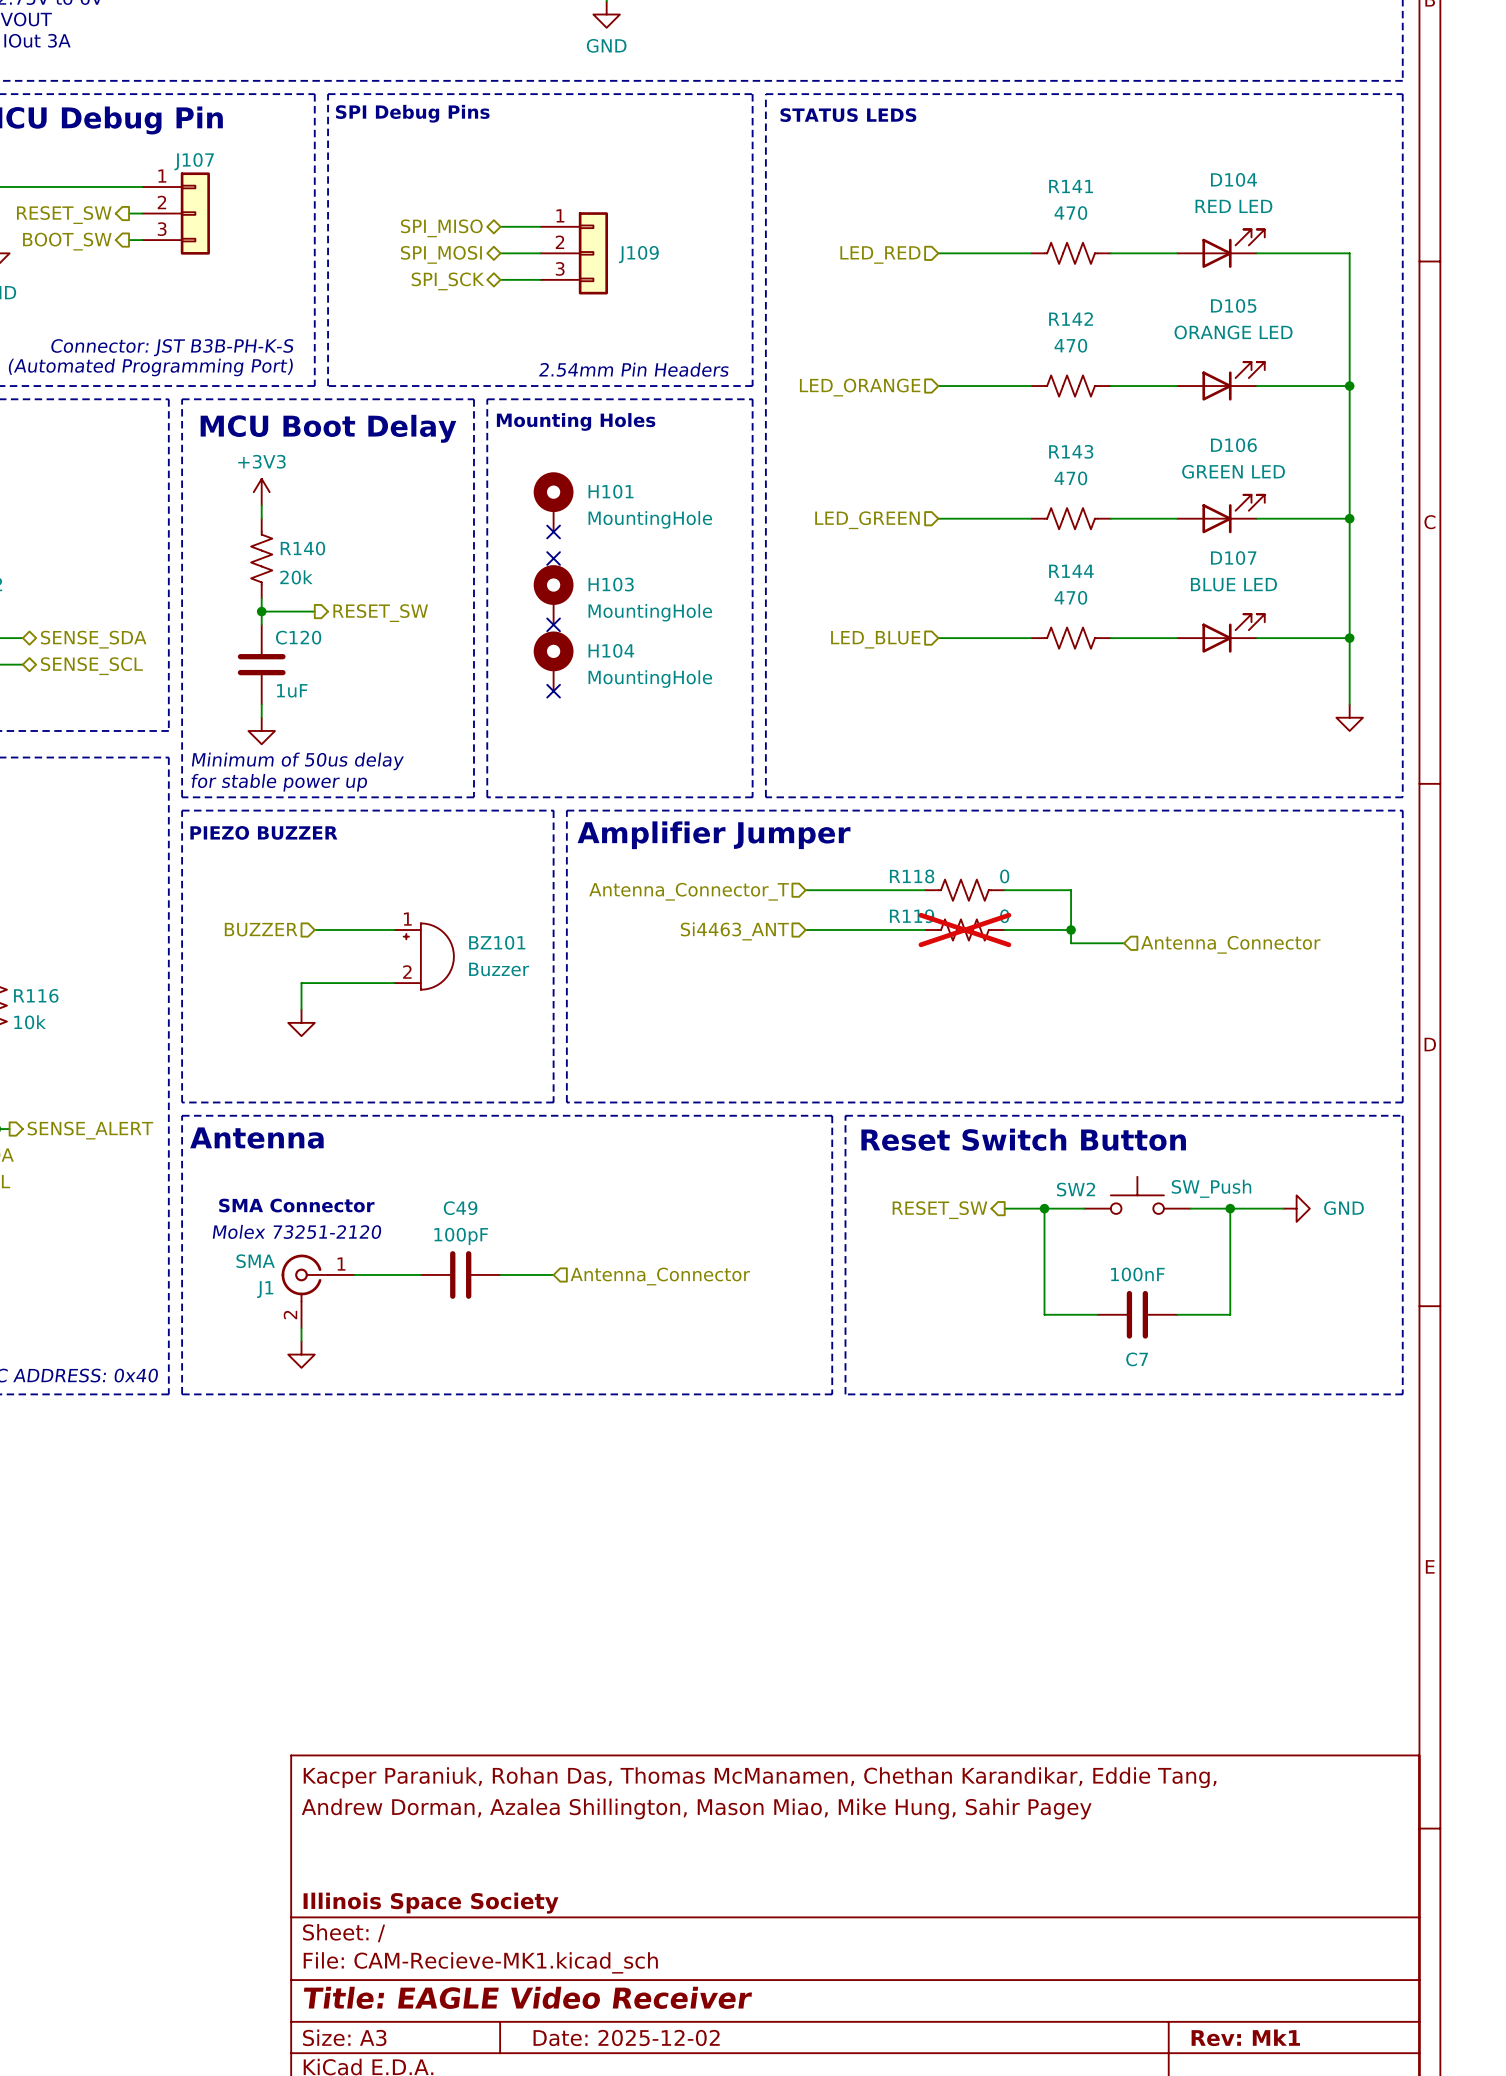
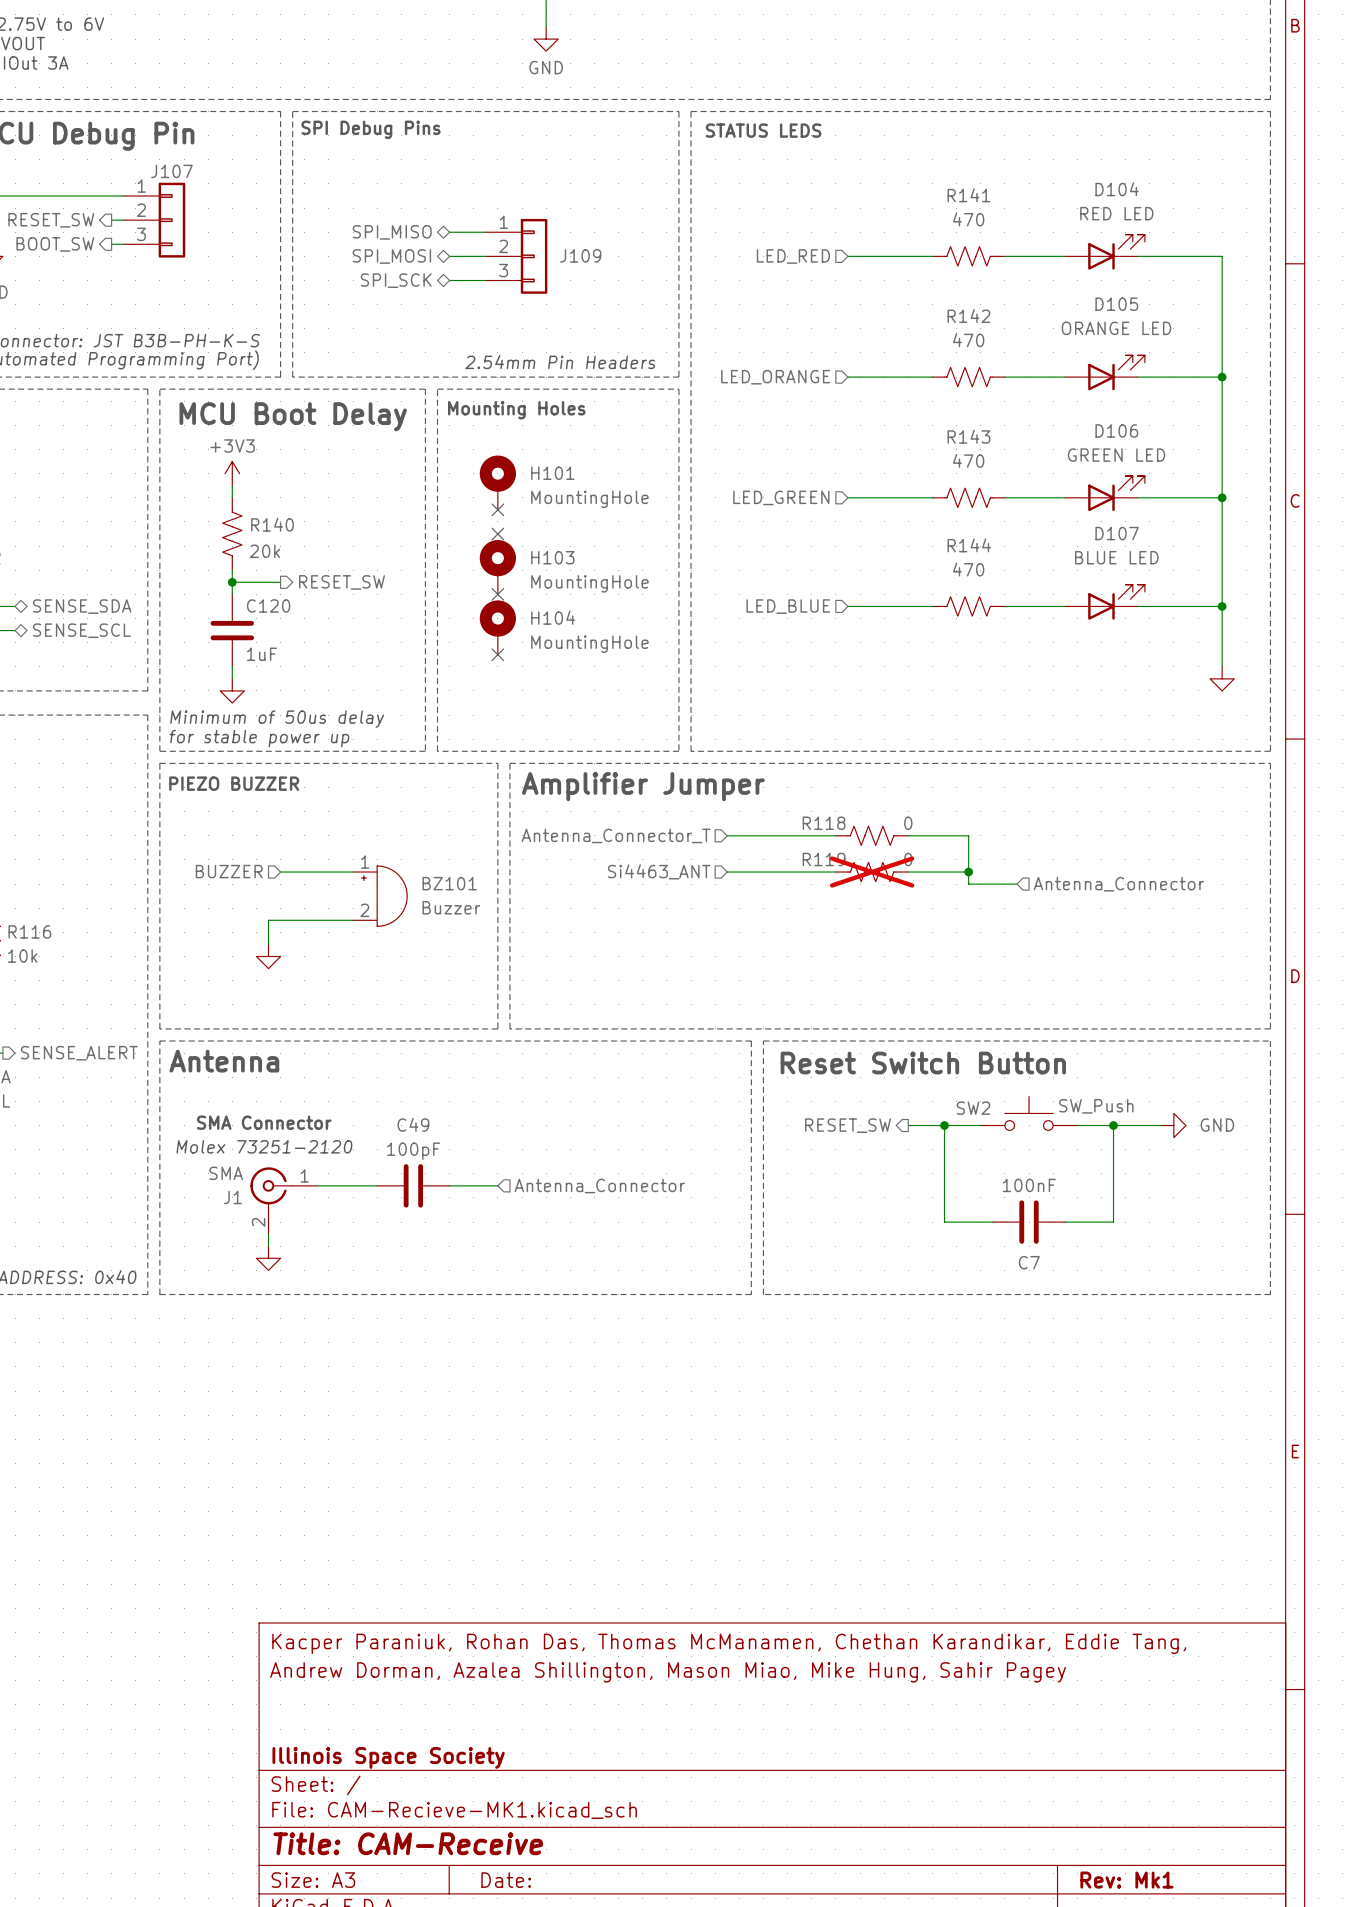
title block: Title: EAGLE Video Receiver (527, 1997) -> Title: CAM-Receive (408, 1843)
title block: Date: 2025-12-02 (626, 2037) -> Date: (506, 1880)

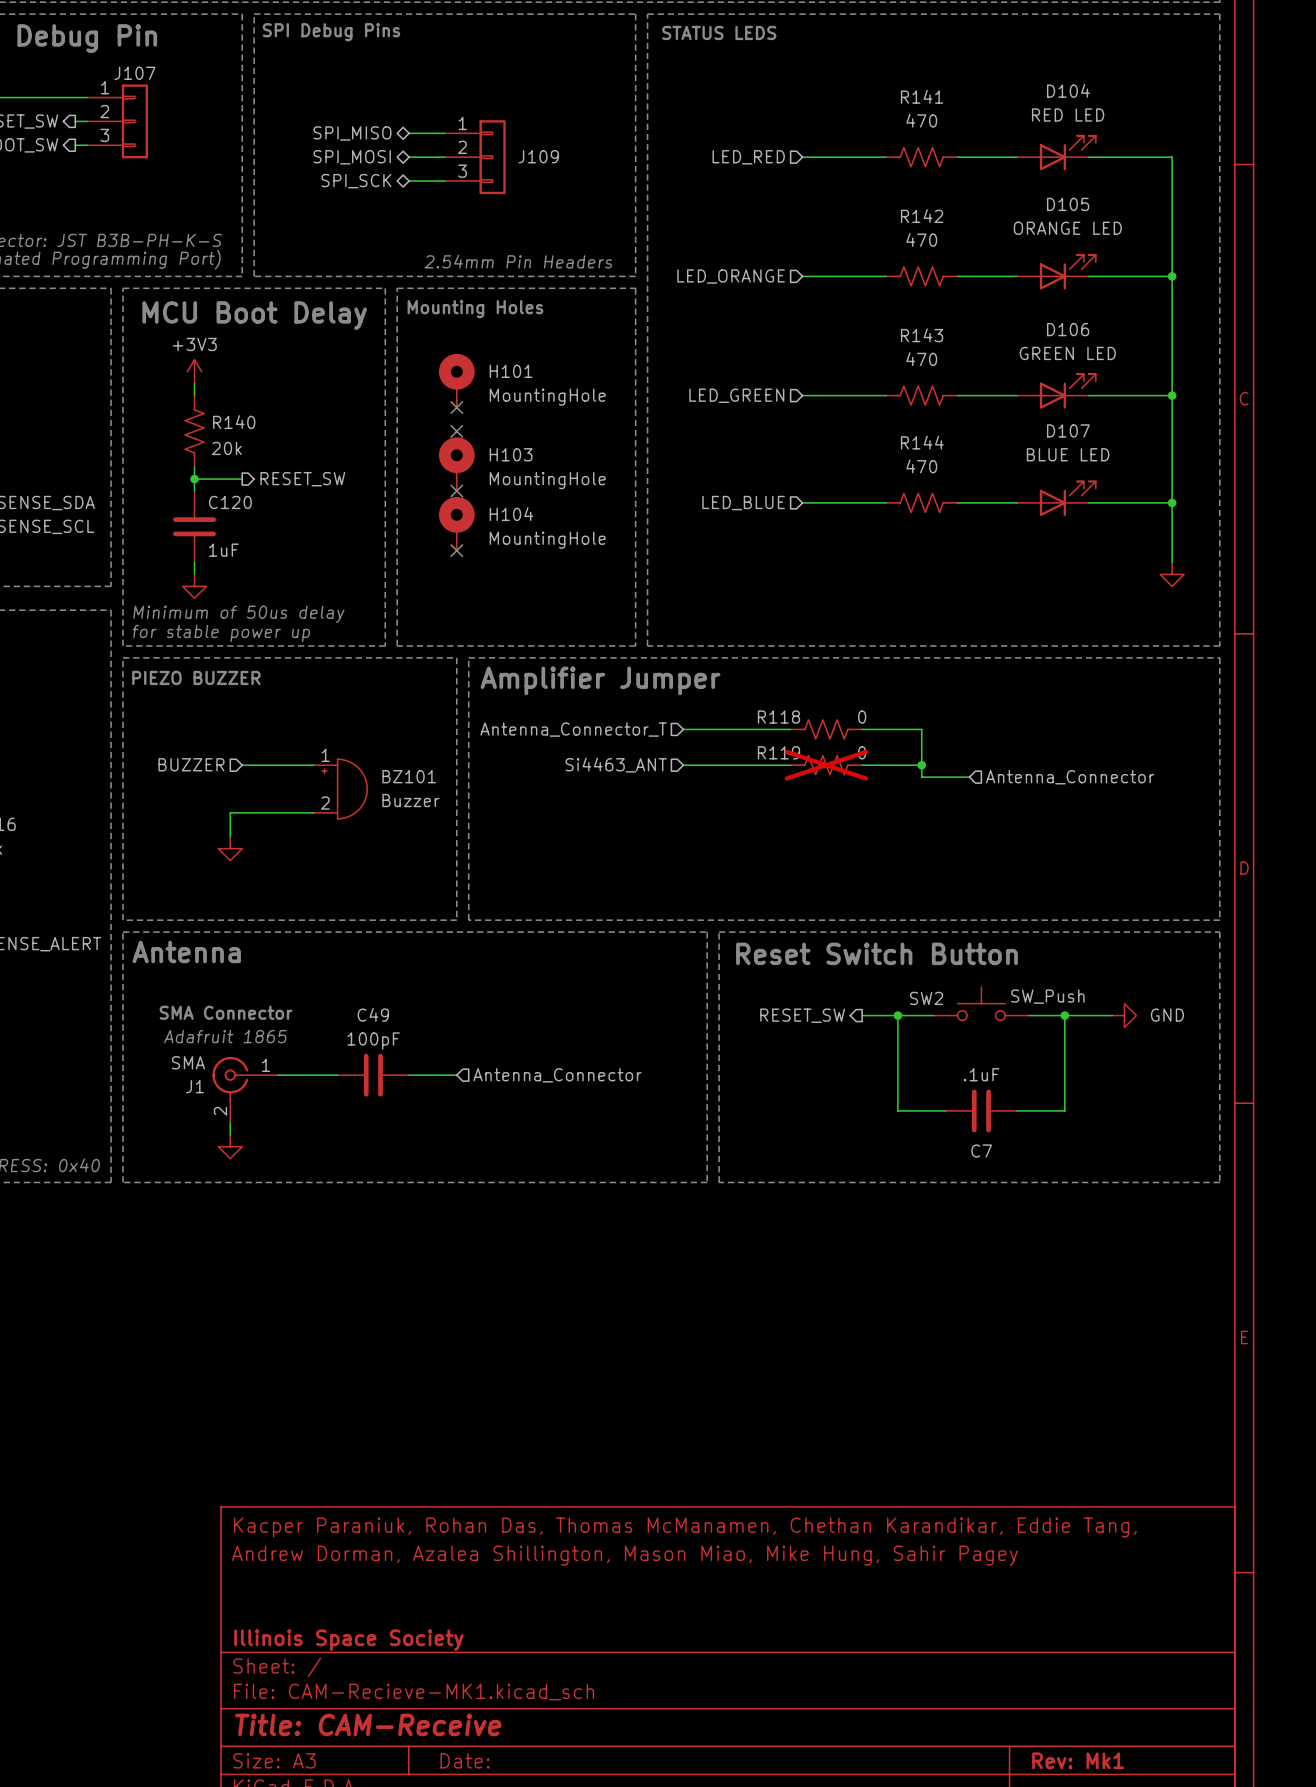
text: Molex 73251-2120 (264, 1146) -> Adafruit 1865 (225, 1036)
C7 value: 100nF (1029, 1185) -> .1uF (981, 1074)

